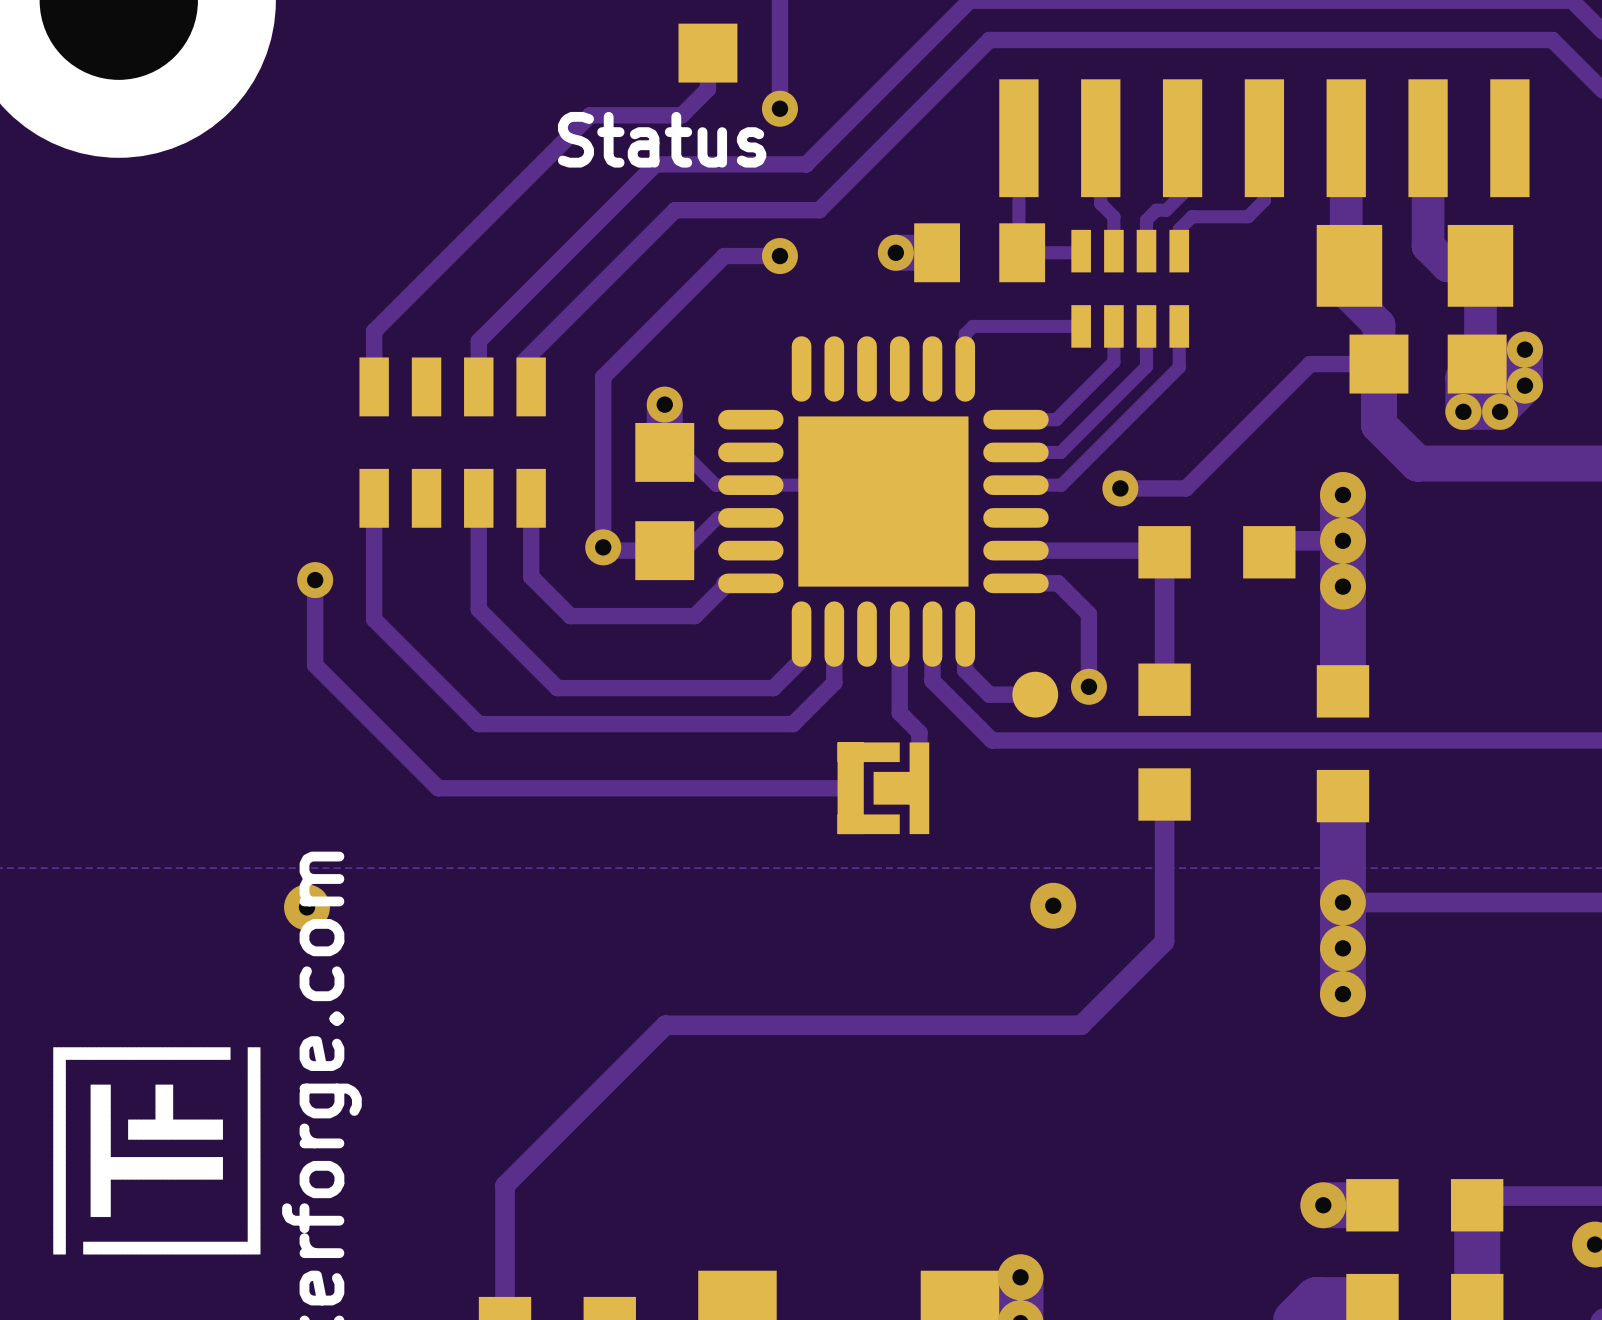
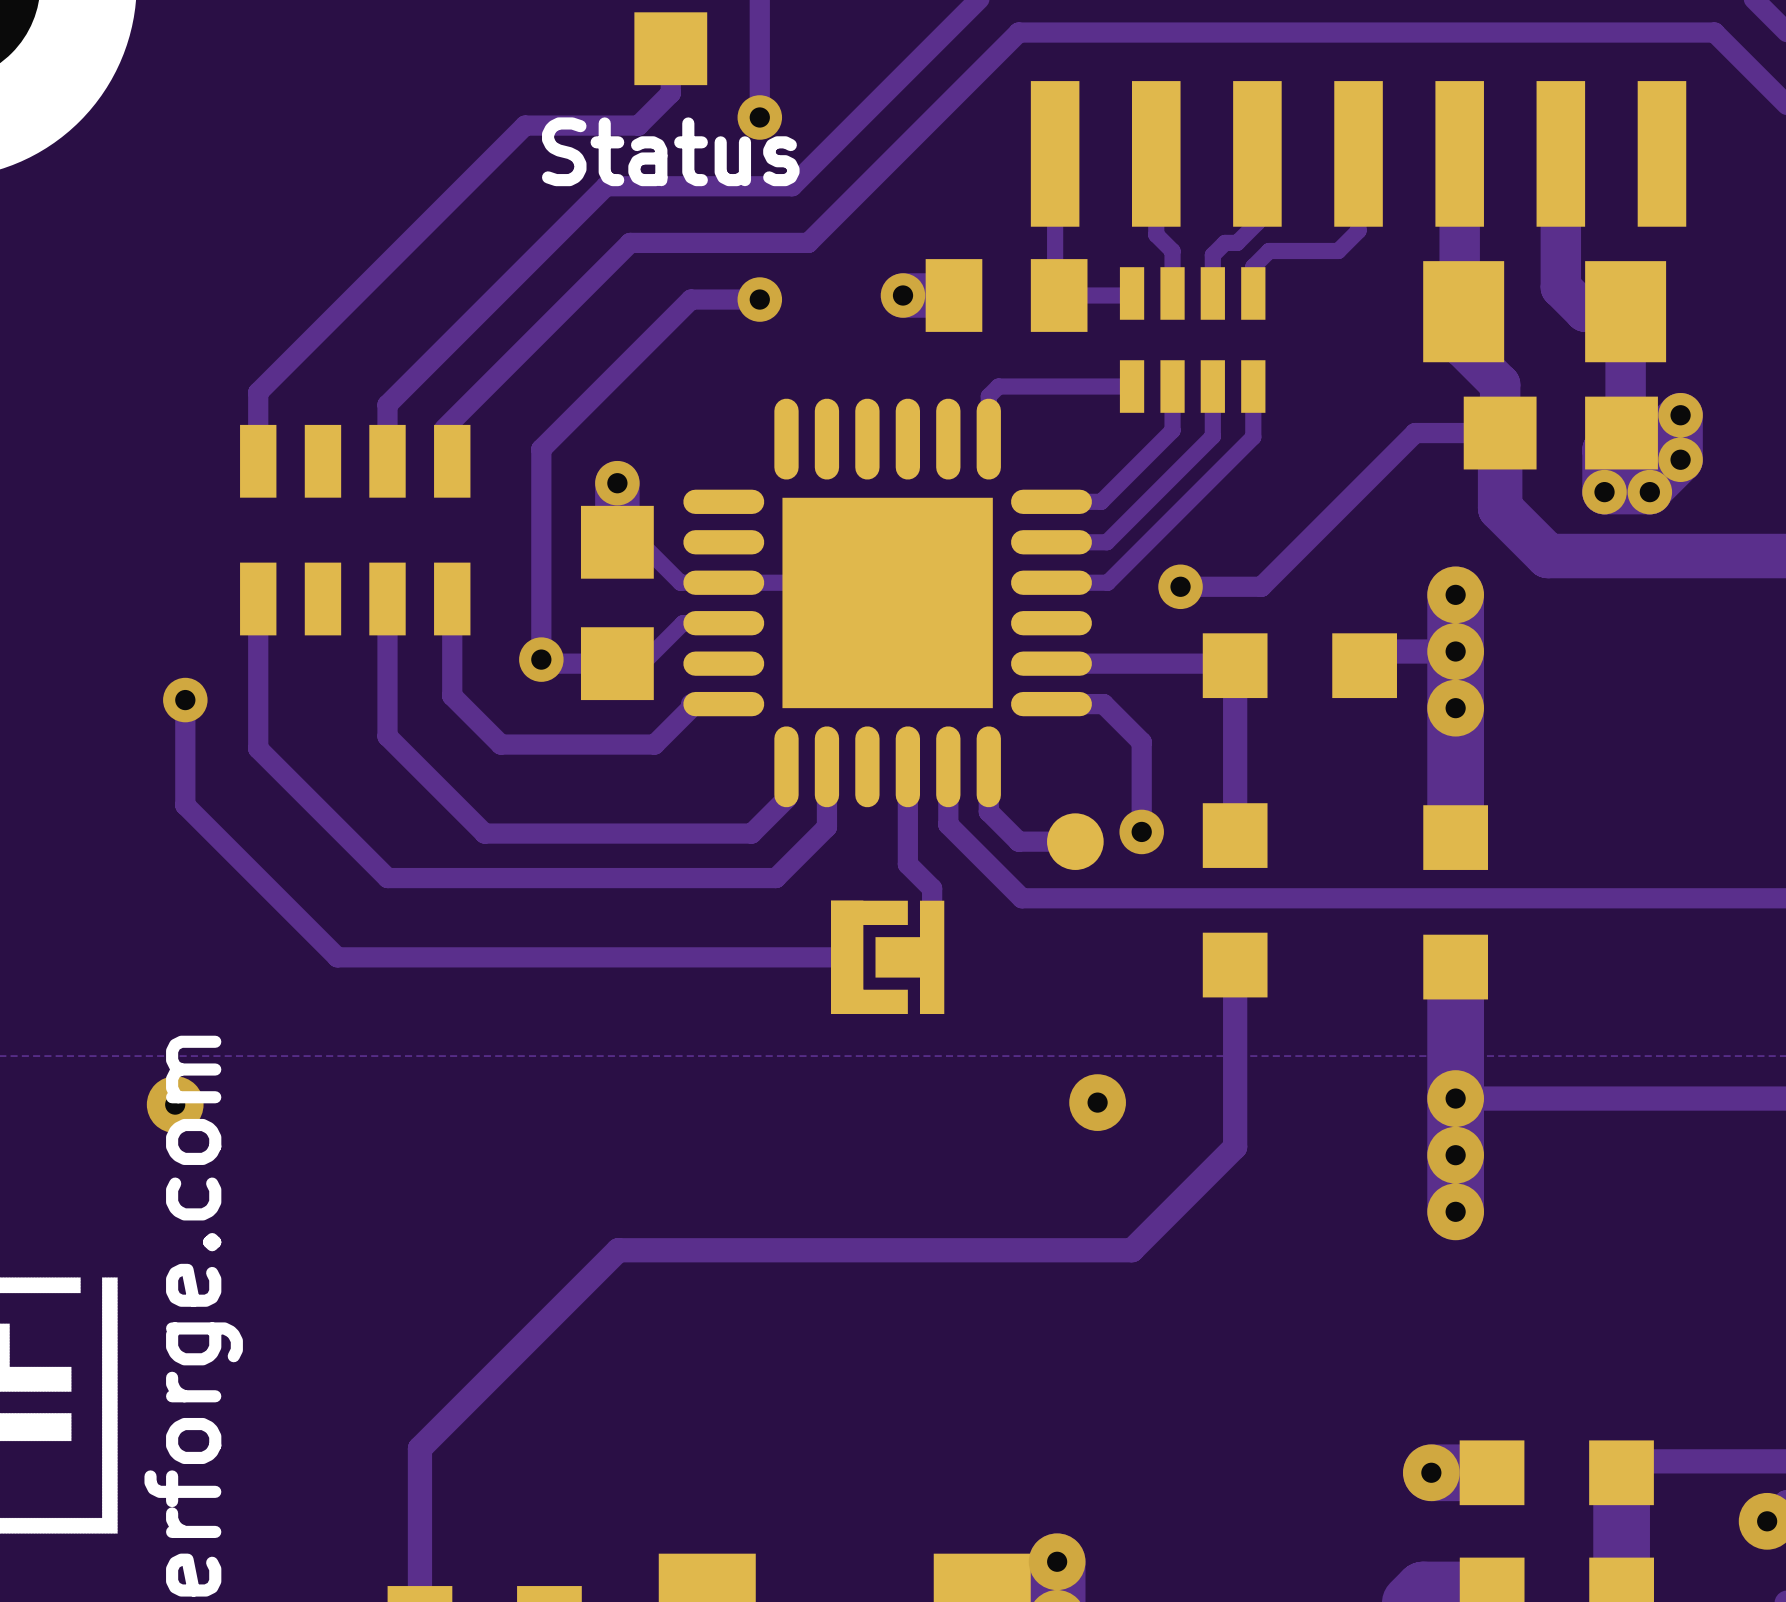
text position: Status (662, 139) -> Status (670, 151)

